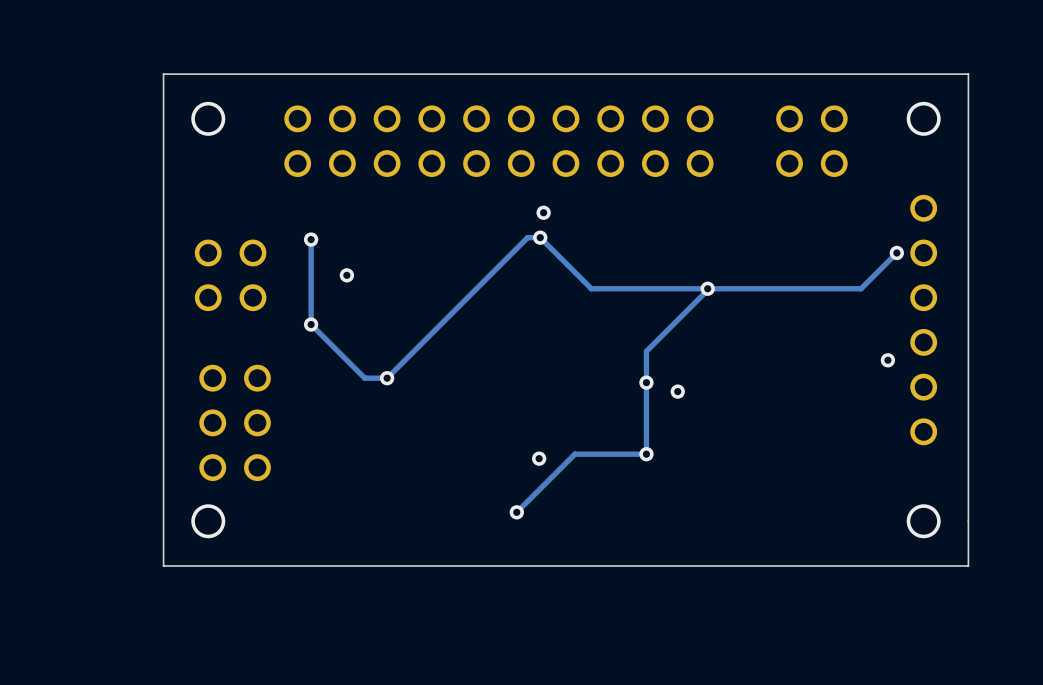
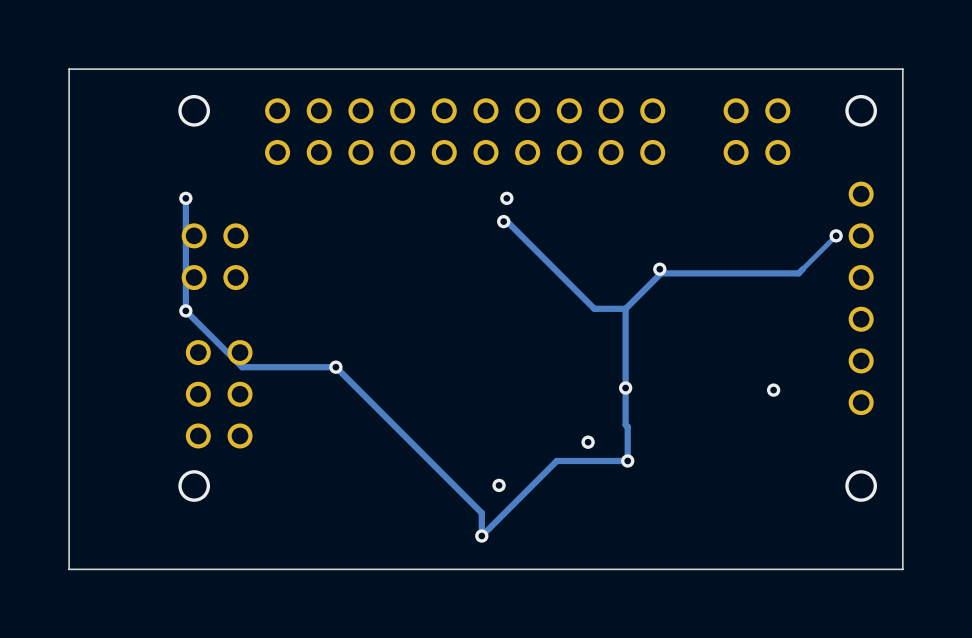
board edge: (163, 74) (163, 565) (968, 565) -> (152, 69) (69, 69) (69, 569) (902, 569) (902, 527)
track: none -> (185, 198) (185, 310) (242, 367) (335, 367) (481, 513) (481, 536) (556, 460) (627, 460) (627, 427) (625, 424) (625, 308)
via: none -> (185, 198)
track: none -> (506, 221) (594, 308) (625, 308)
track: (311, 239) (311, 324) (364, 378) (387, 378) (527, 237) (540, 237) (591, 288) (861, 288) -> (625, 308) (661, 273) (798, 273) (802, 269)
via: (311, 239) -> none
via: (346, 275) -> none
track: (709, 288) (646, 351) (646, 454) (574, 454) (516, 512) -> none
via: (311, 324) -> none
via: none -> (185, 310)
via: (887, 360) -> none
via position: (387, 378) -> (335, 367)
via: (646, 382) -> none
via: (677, 391) -> none
via: none -> (625, 388)
via: none -> (773, 390)
via: (646, 454) -> none
via: (539, 458) -> none
via: none -> (588, 442)
via: none -> (627, 460)
via position: (516, 512) -> (499, 485)
via: none -> (481, 536)

